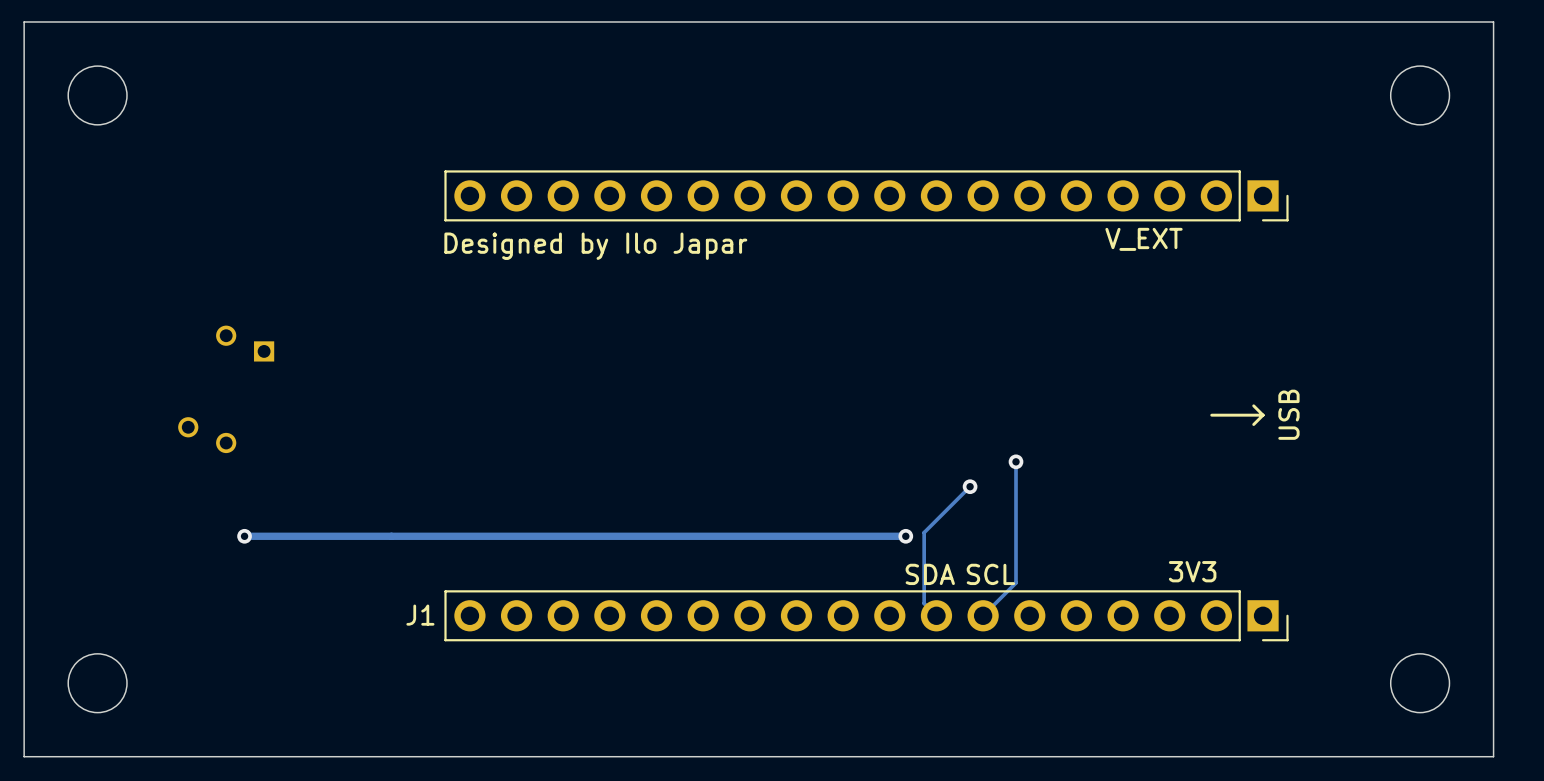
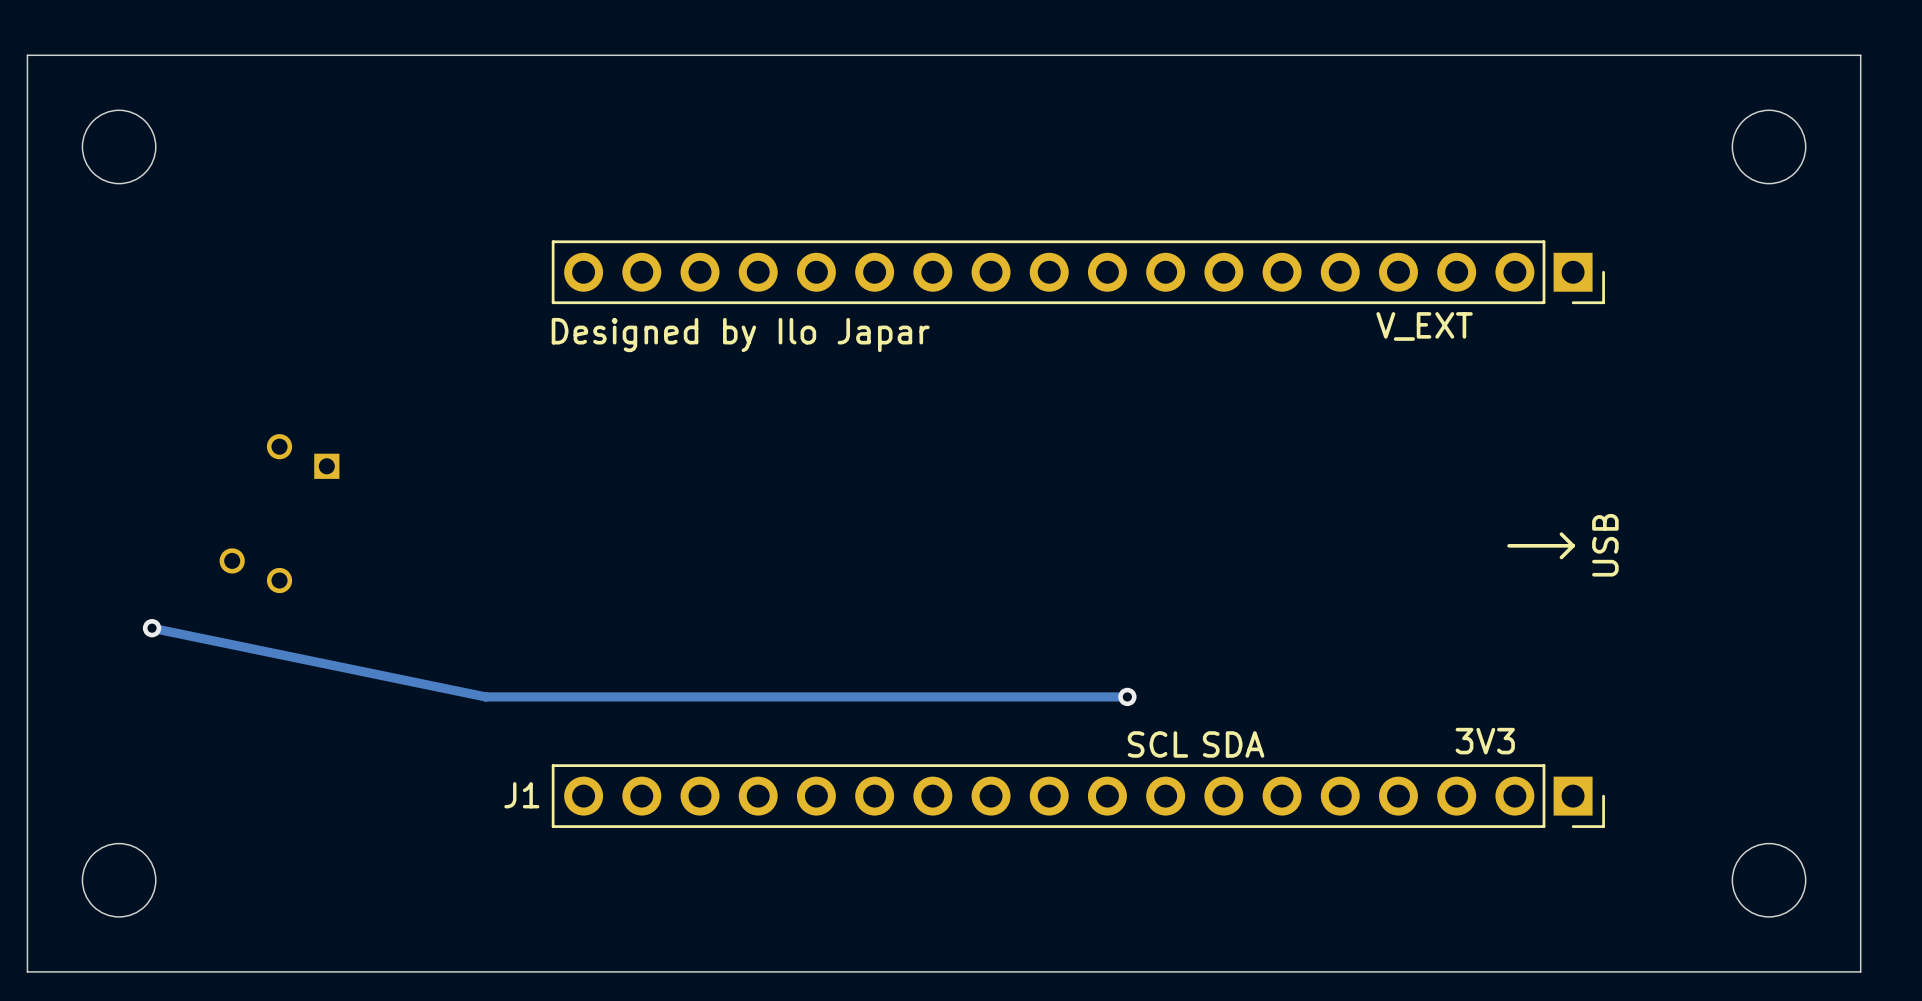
track: (1016, 461) (1016, 582) (983, 615) -> none
via: (1016, 461) -> none
via: none -> (152, 628)
track: (970, 486) (924, 532) (924, 603) (936, 615) -> none
via: (970, 486) -> none
via: (244, 536) -> none
track: (391, 536) (244, 536) -> (485, 696) (152, 628)
text: SDA (930, 574) -> SCL (1157, 744)
text: SCL (990, 574) -> SDA (1233, 744)

